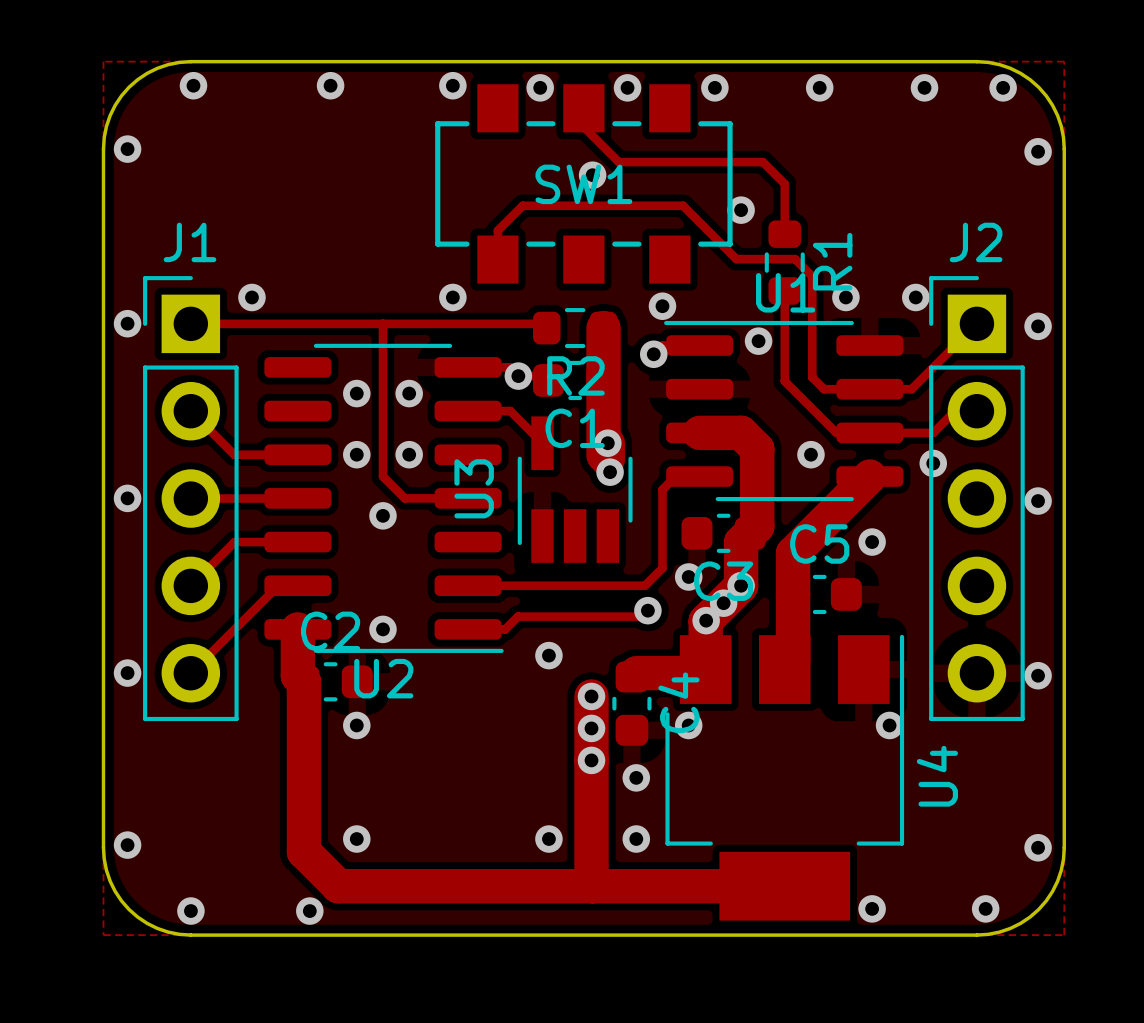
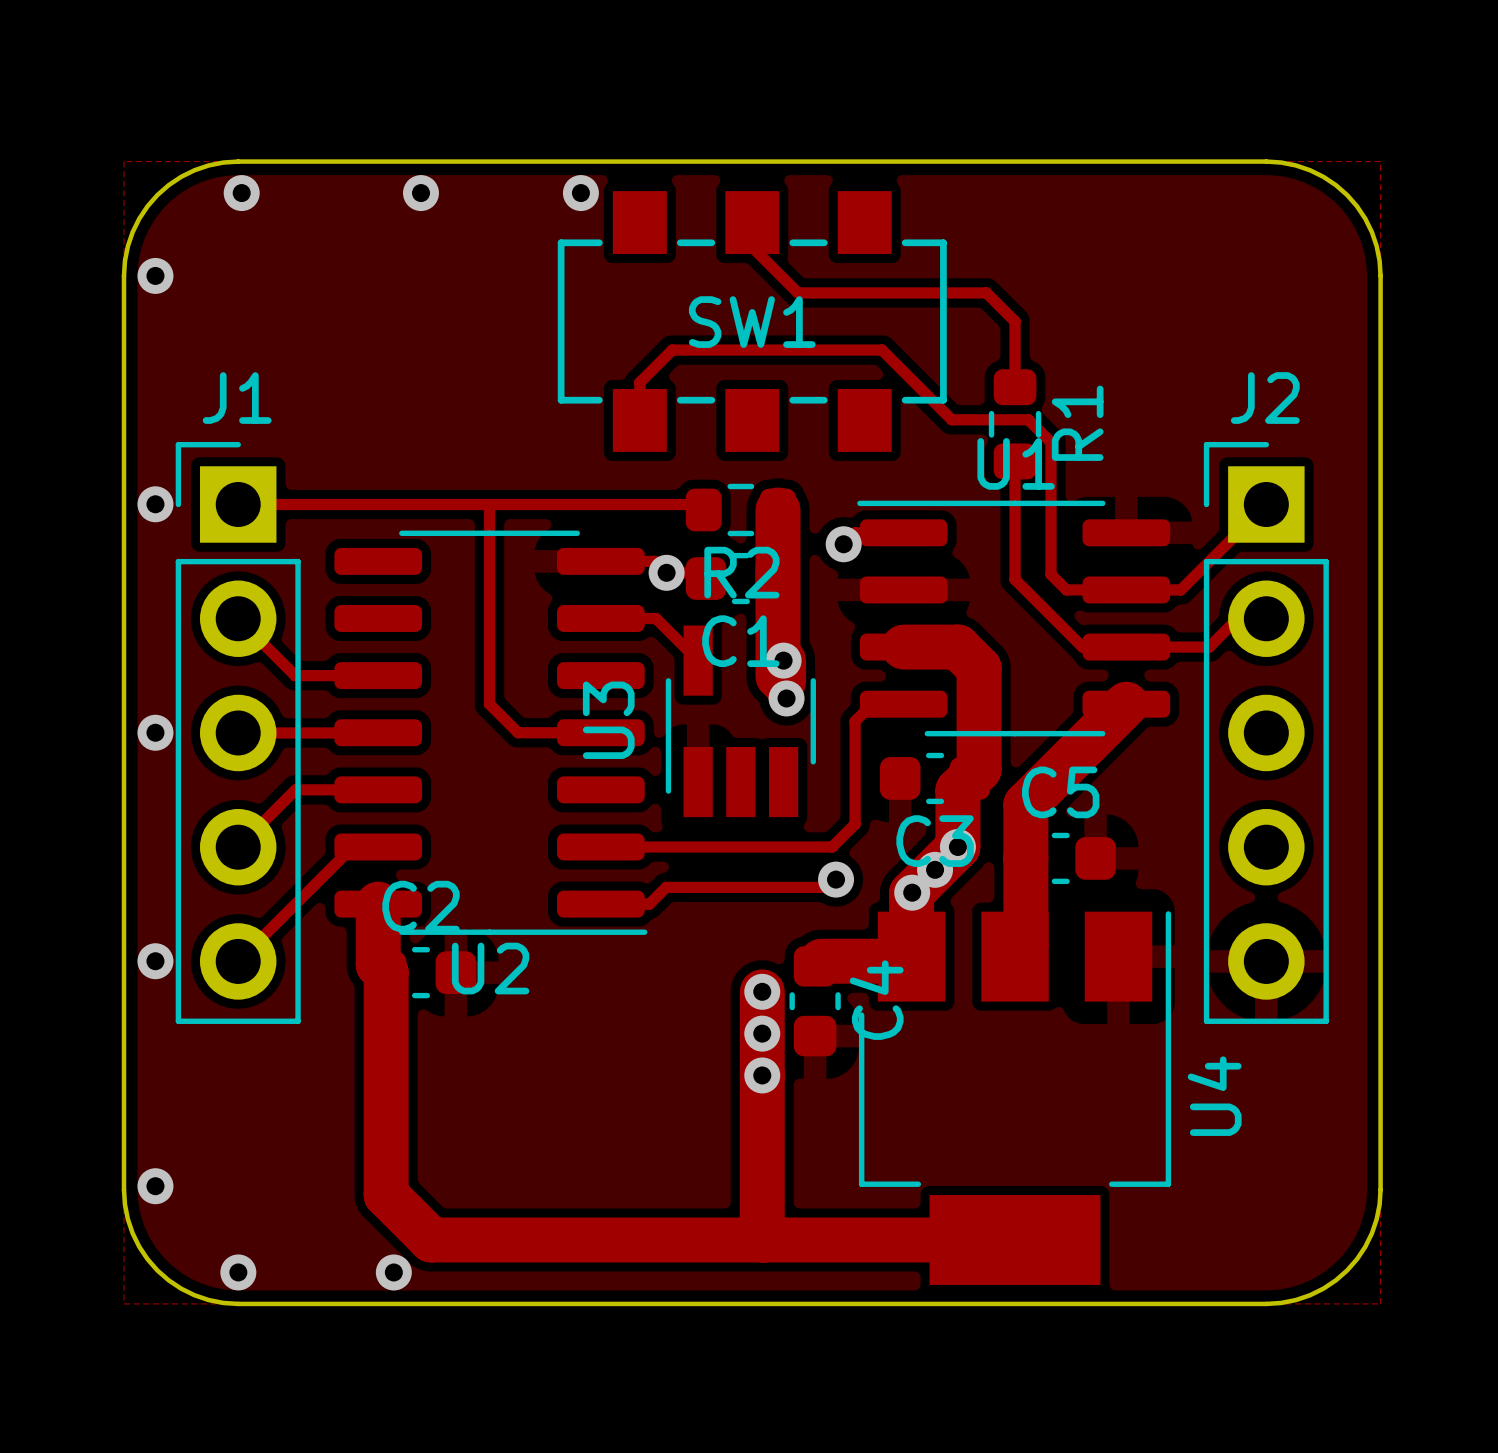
via: (540, 87) -> none
via: (627, 87) -> none
via: (714, 87) -> none
via: (819, 87) -> none
via: (924, 87) -> none
via: (1003, 87) -> none
via: (1038, 151) -> none
via: (592, 175) -> none
via: (741, 210) -> none
via: (251, 297) -> none
via: (452, 297) -> none
via: (845, 297) -> none
via: (915, 297) -> none
via: (662, 306) -> none
via: (1038, 326) -> none
via: (758, 341) -> none
via: (356, 393) -> none
via: (409, 393) -> none
via: (356, 454) -> none
via: (409, 454) -> none
via: (810, 454) -> none
via: (933, 463) -> none
via: (1038, 501) -> none
via: (382, 515) -> none
via: (872, 542) -> none
via: (688, 576) -> none
via: (382, 629) -> none
via: (548, 655) -> none
via: (1038, 675) -> none
via: (356, 725) -> none
via: (688, 725) -> none
via: (889, 725) -> none
via: (636, 777) -> none
via: (356, 839) -> none
via: (548, 839) -> none
via: (636, 839) -> none
via: (1038, 847) -> none
via: (872, 908) -> none
via: (985, 908) -> none

